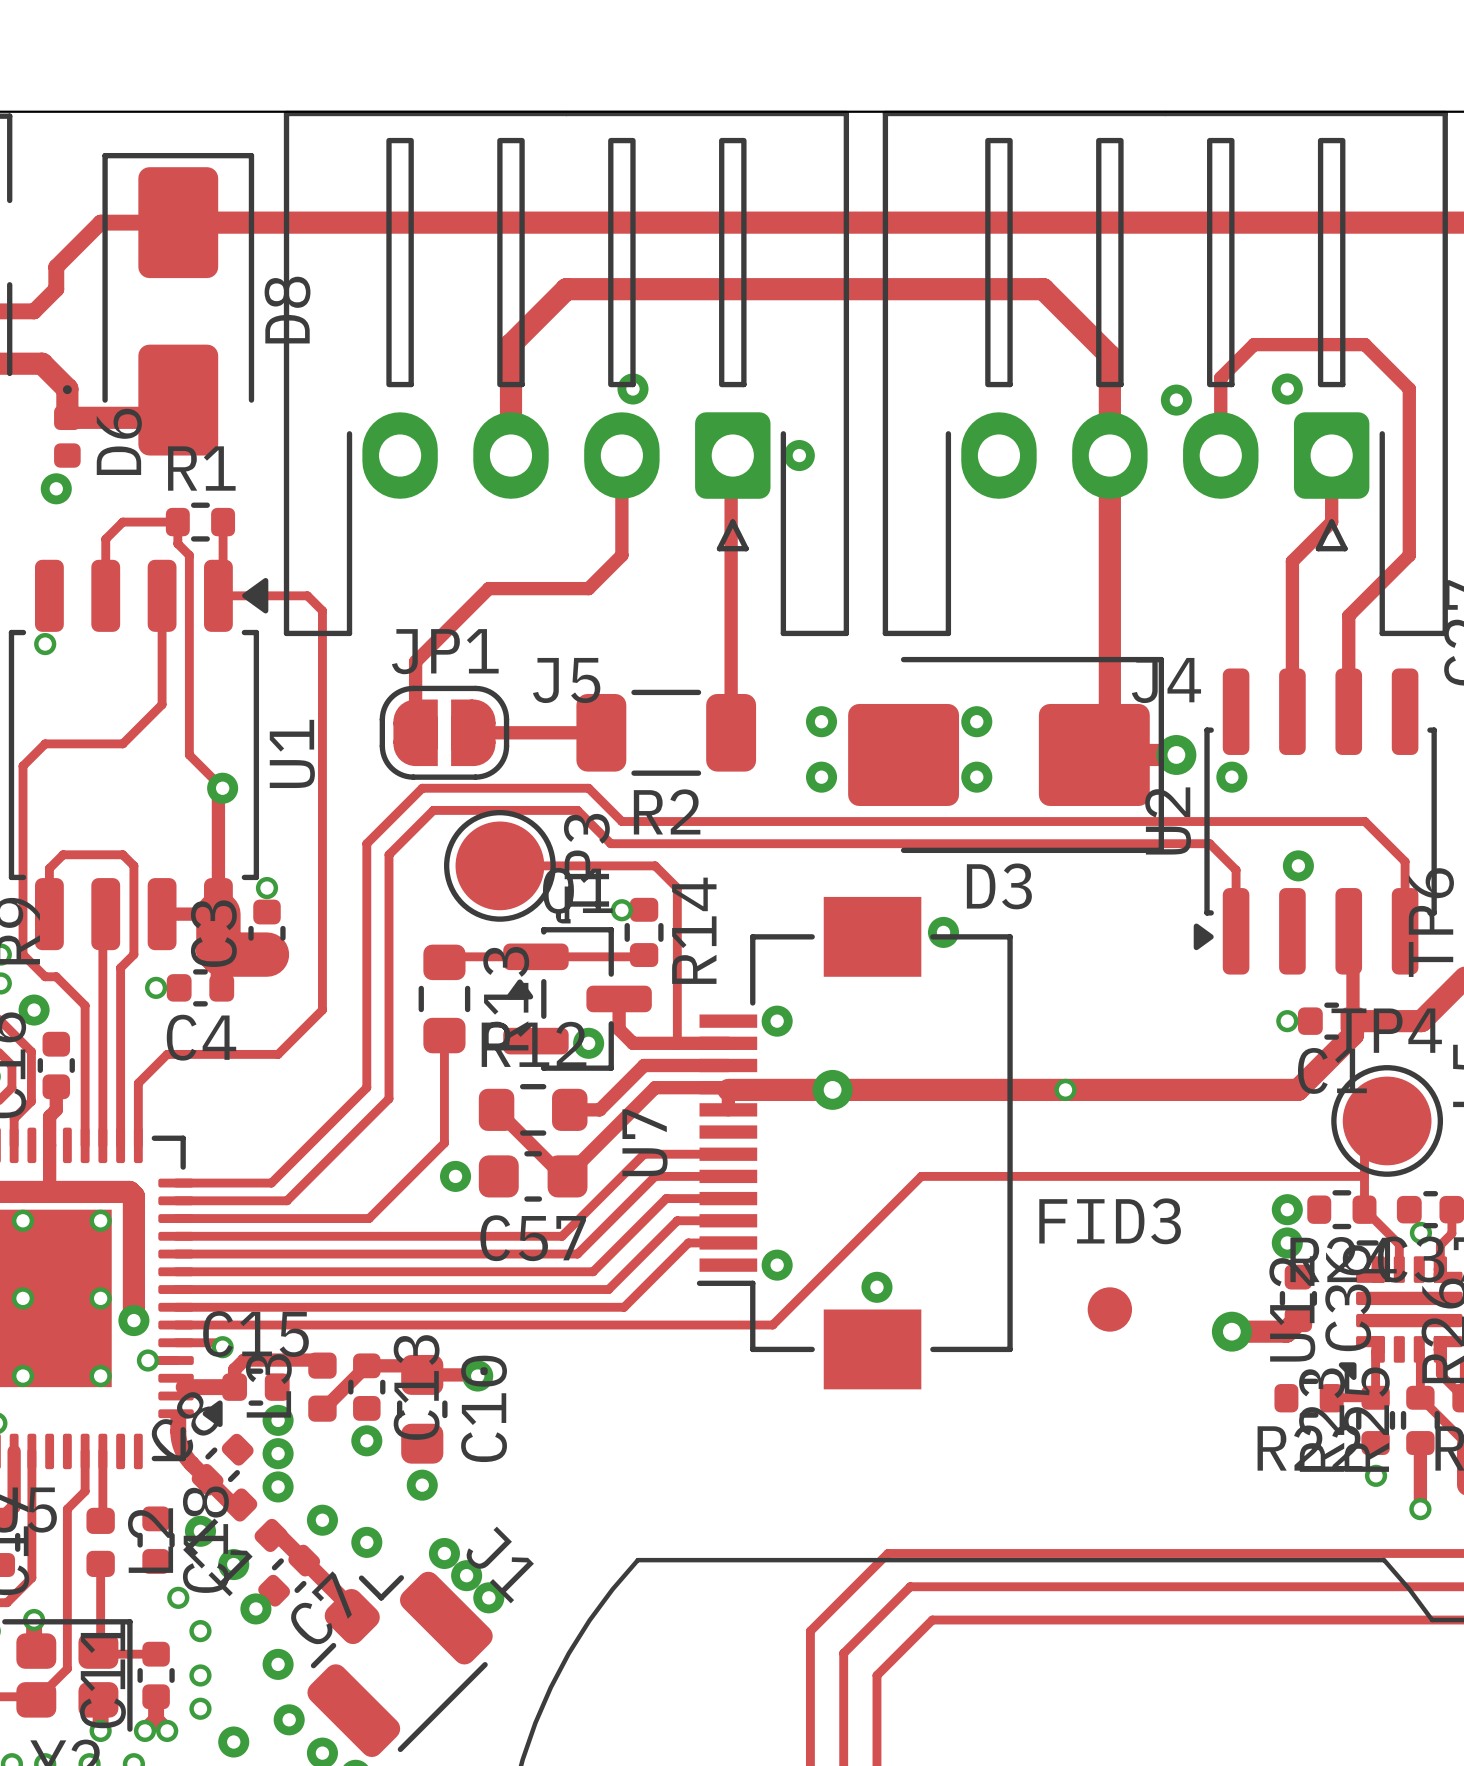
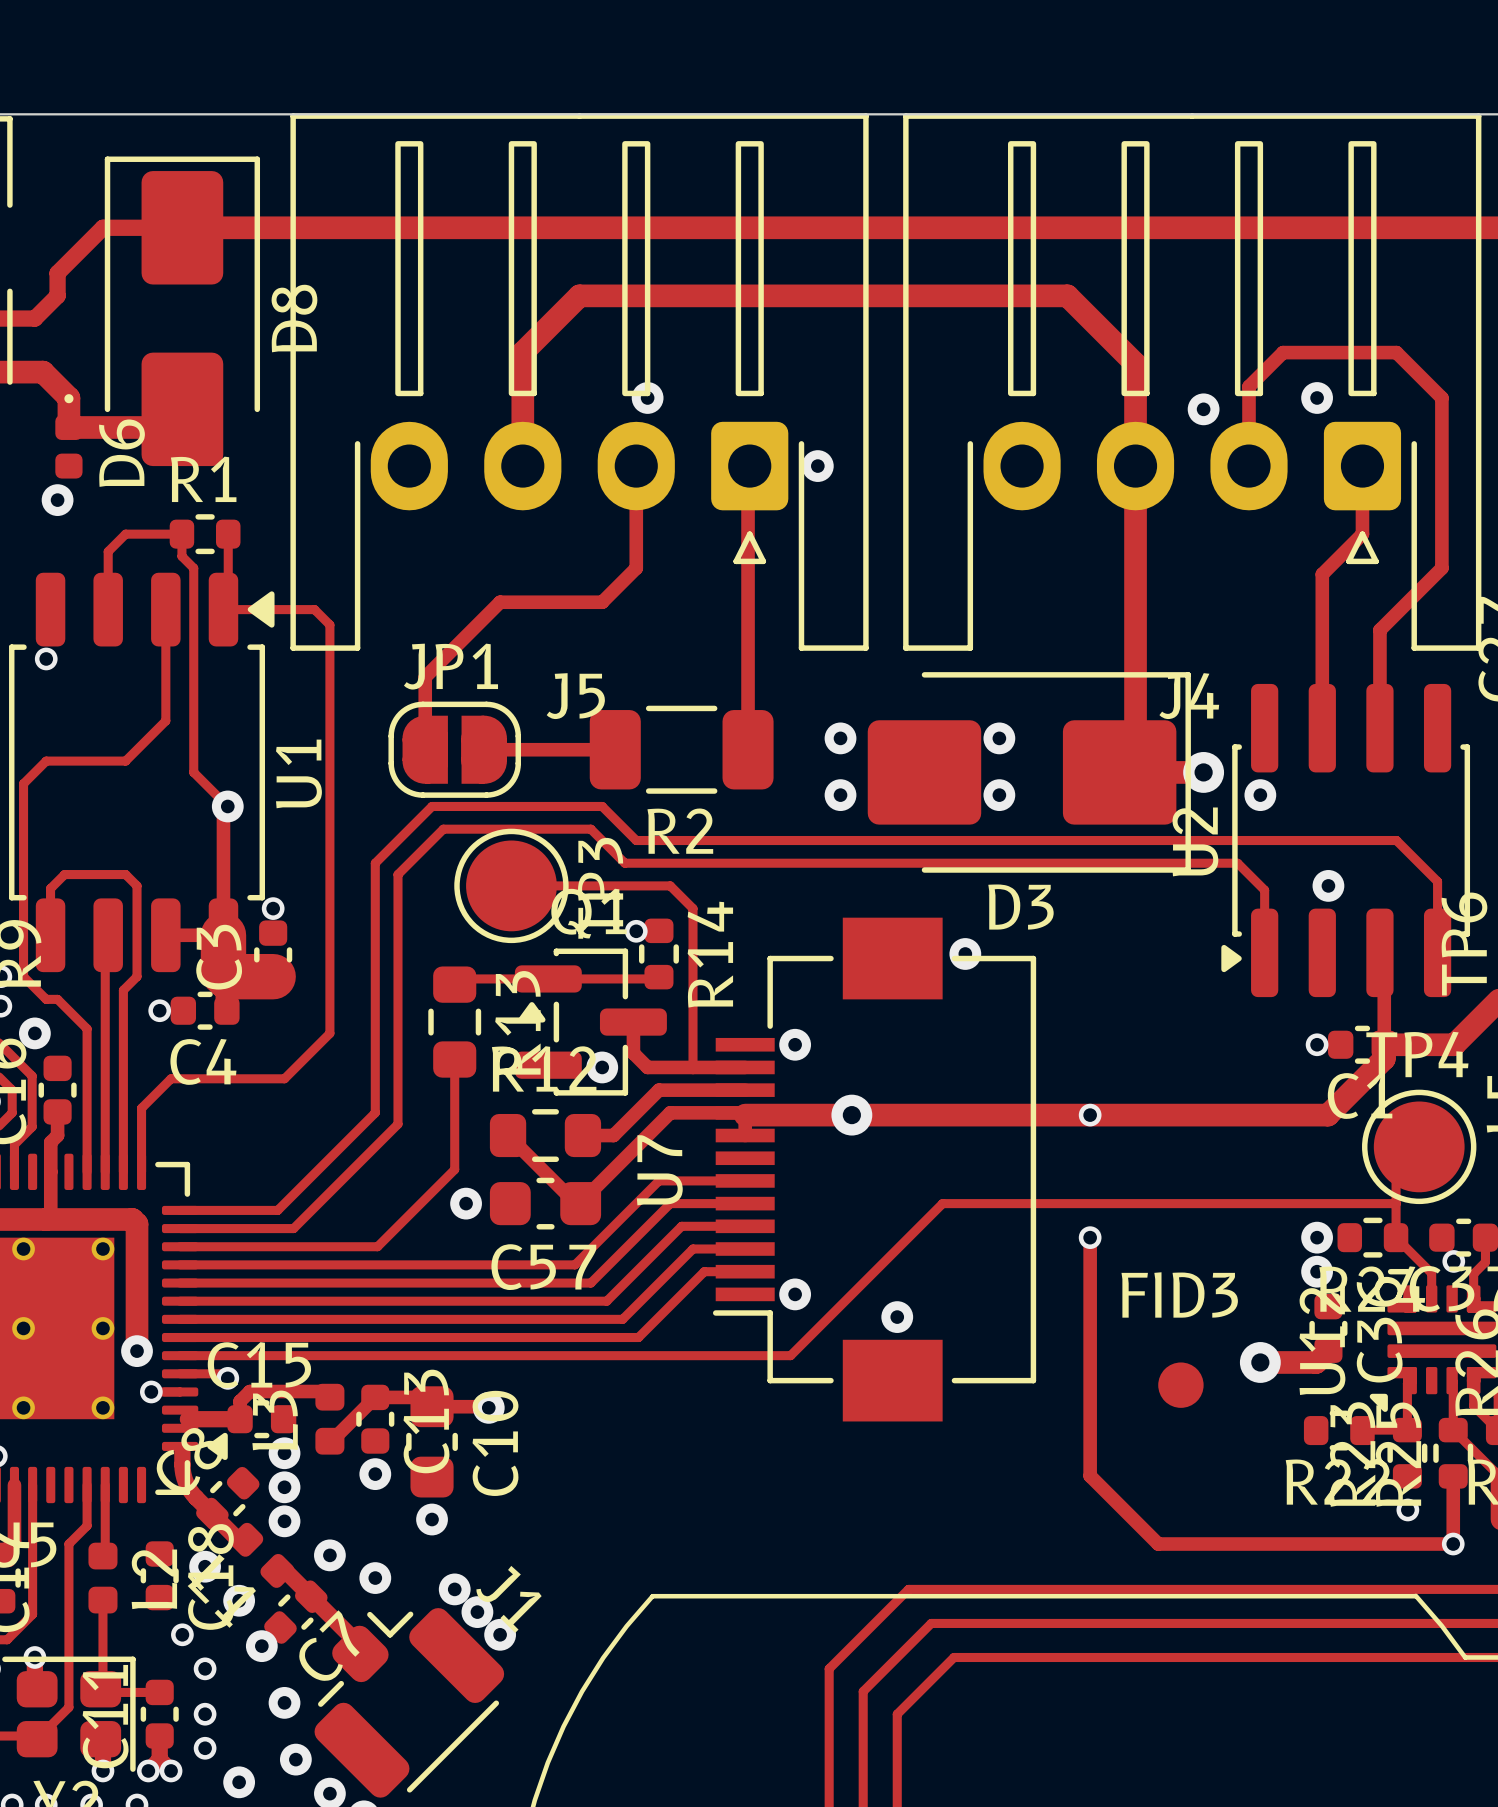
track: none -> (1090, 1237) (1090, 1475) (1158, 1544) (1453, 1544)
via: none -> (1090, 1237)
FID3 position: (1109, 1309) -> (1180, 1385)

